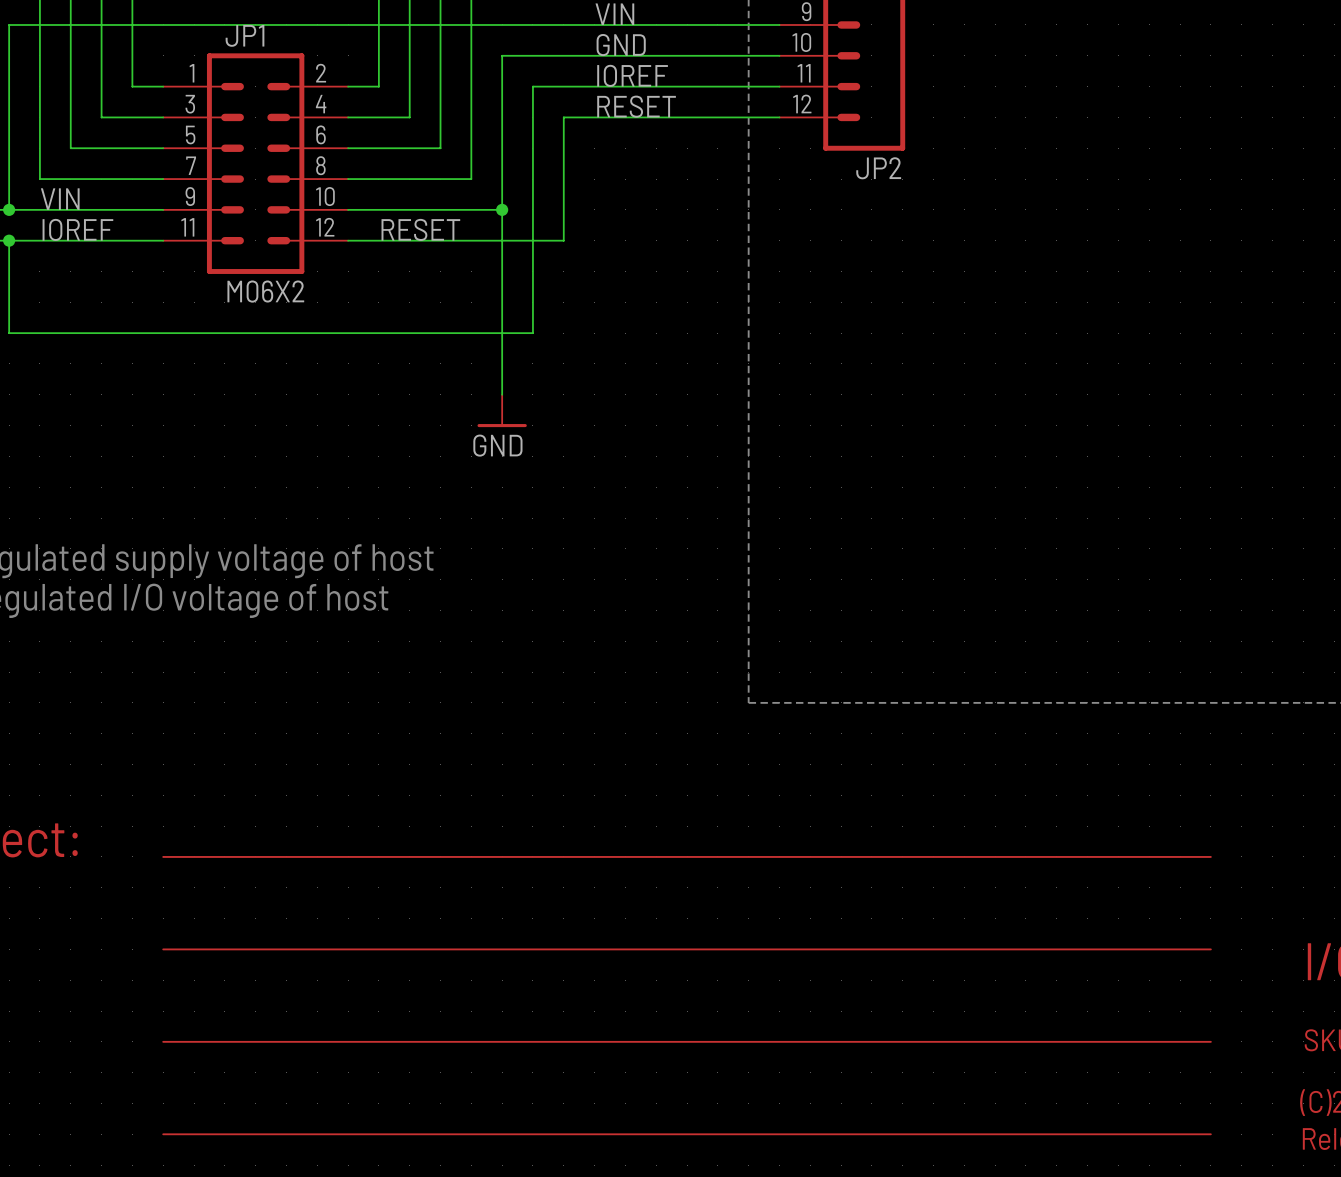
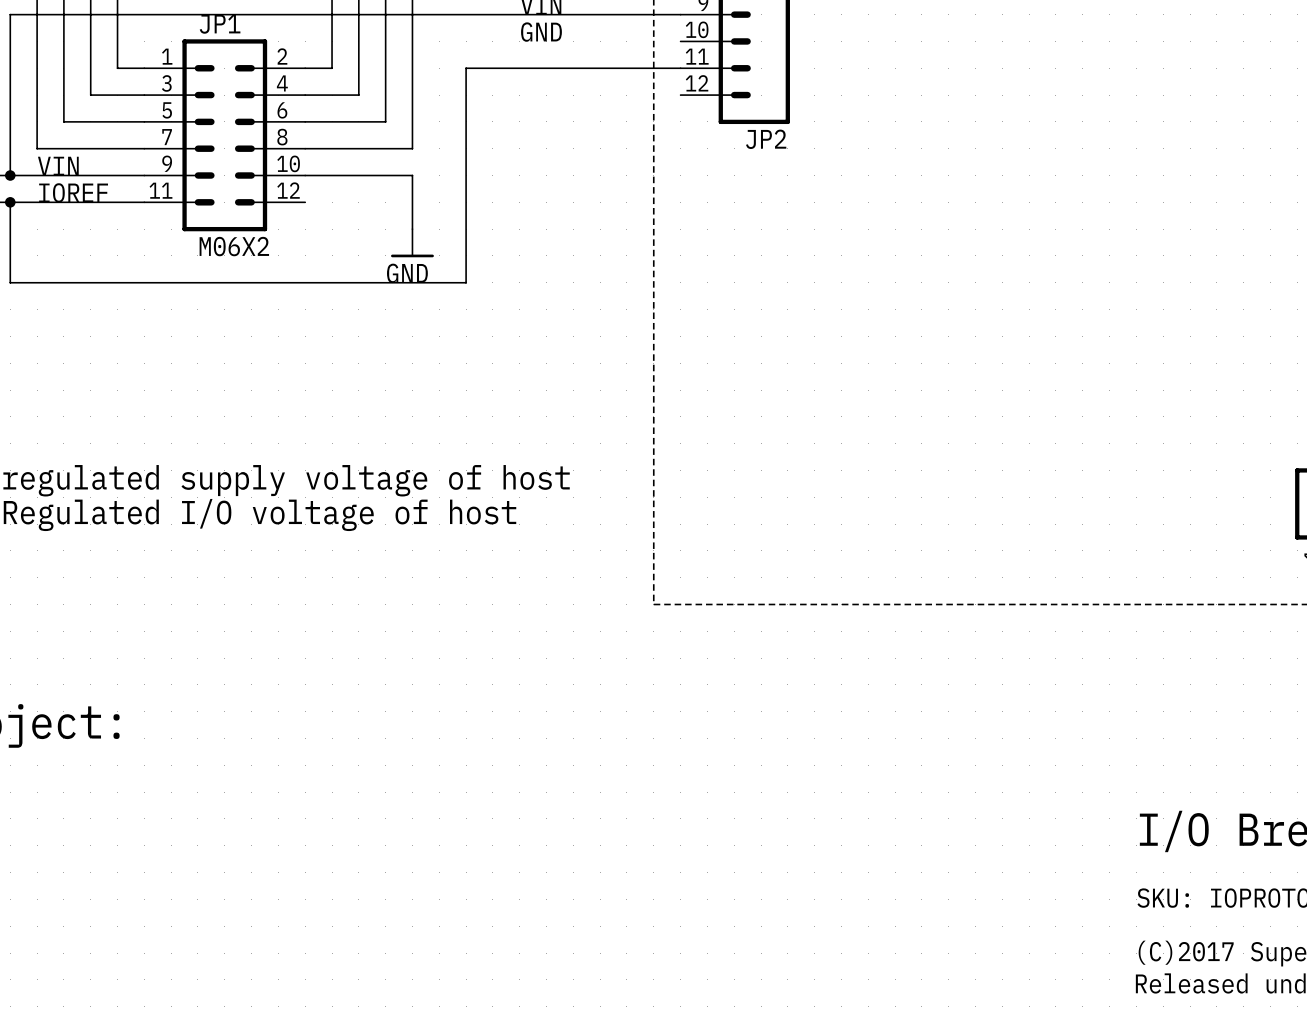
wire: (779, 55) (502, 55) (502, 394) -> none
label: IOREF (632, 75) -> none
label: RESET (636, 106) -> none
wire: (779, 117) (563, 117) (563, 240) (348, 240) -> none
wire: (471, 209) (502, 209) -> (412, 175) (412, 229)
junction: (502, 209) -> none
label: RESET (420, 229) -> none
power symbol position: GND (502, 410) -> GND (412, 243)
line: (163, 856) (1210, 856) -> none
line: (163, 949) (1210, 949) -> none
line: (163, 1041) (1210, 1041) -> none
line: (163, 1134) (1210, 1134) -> none

